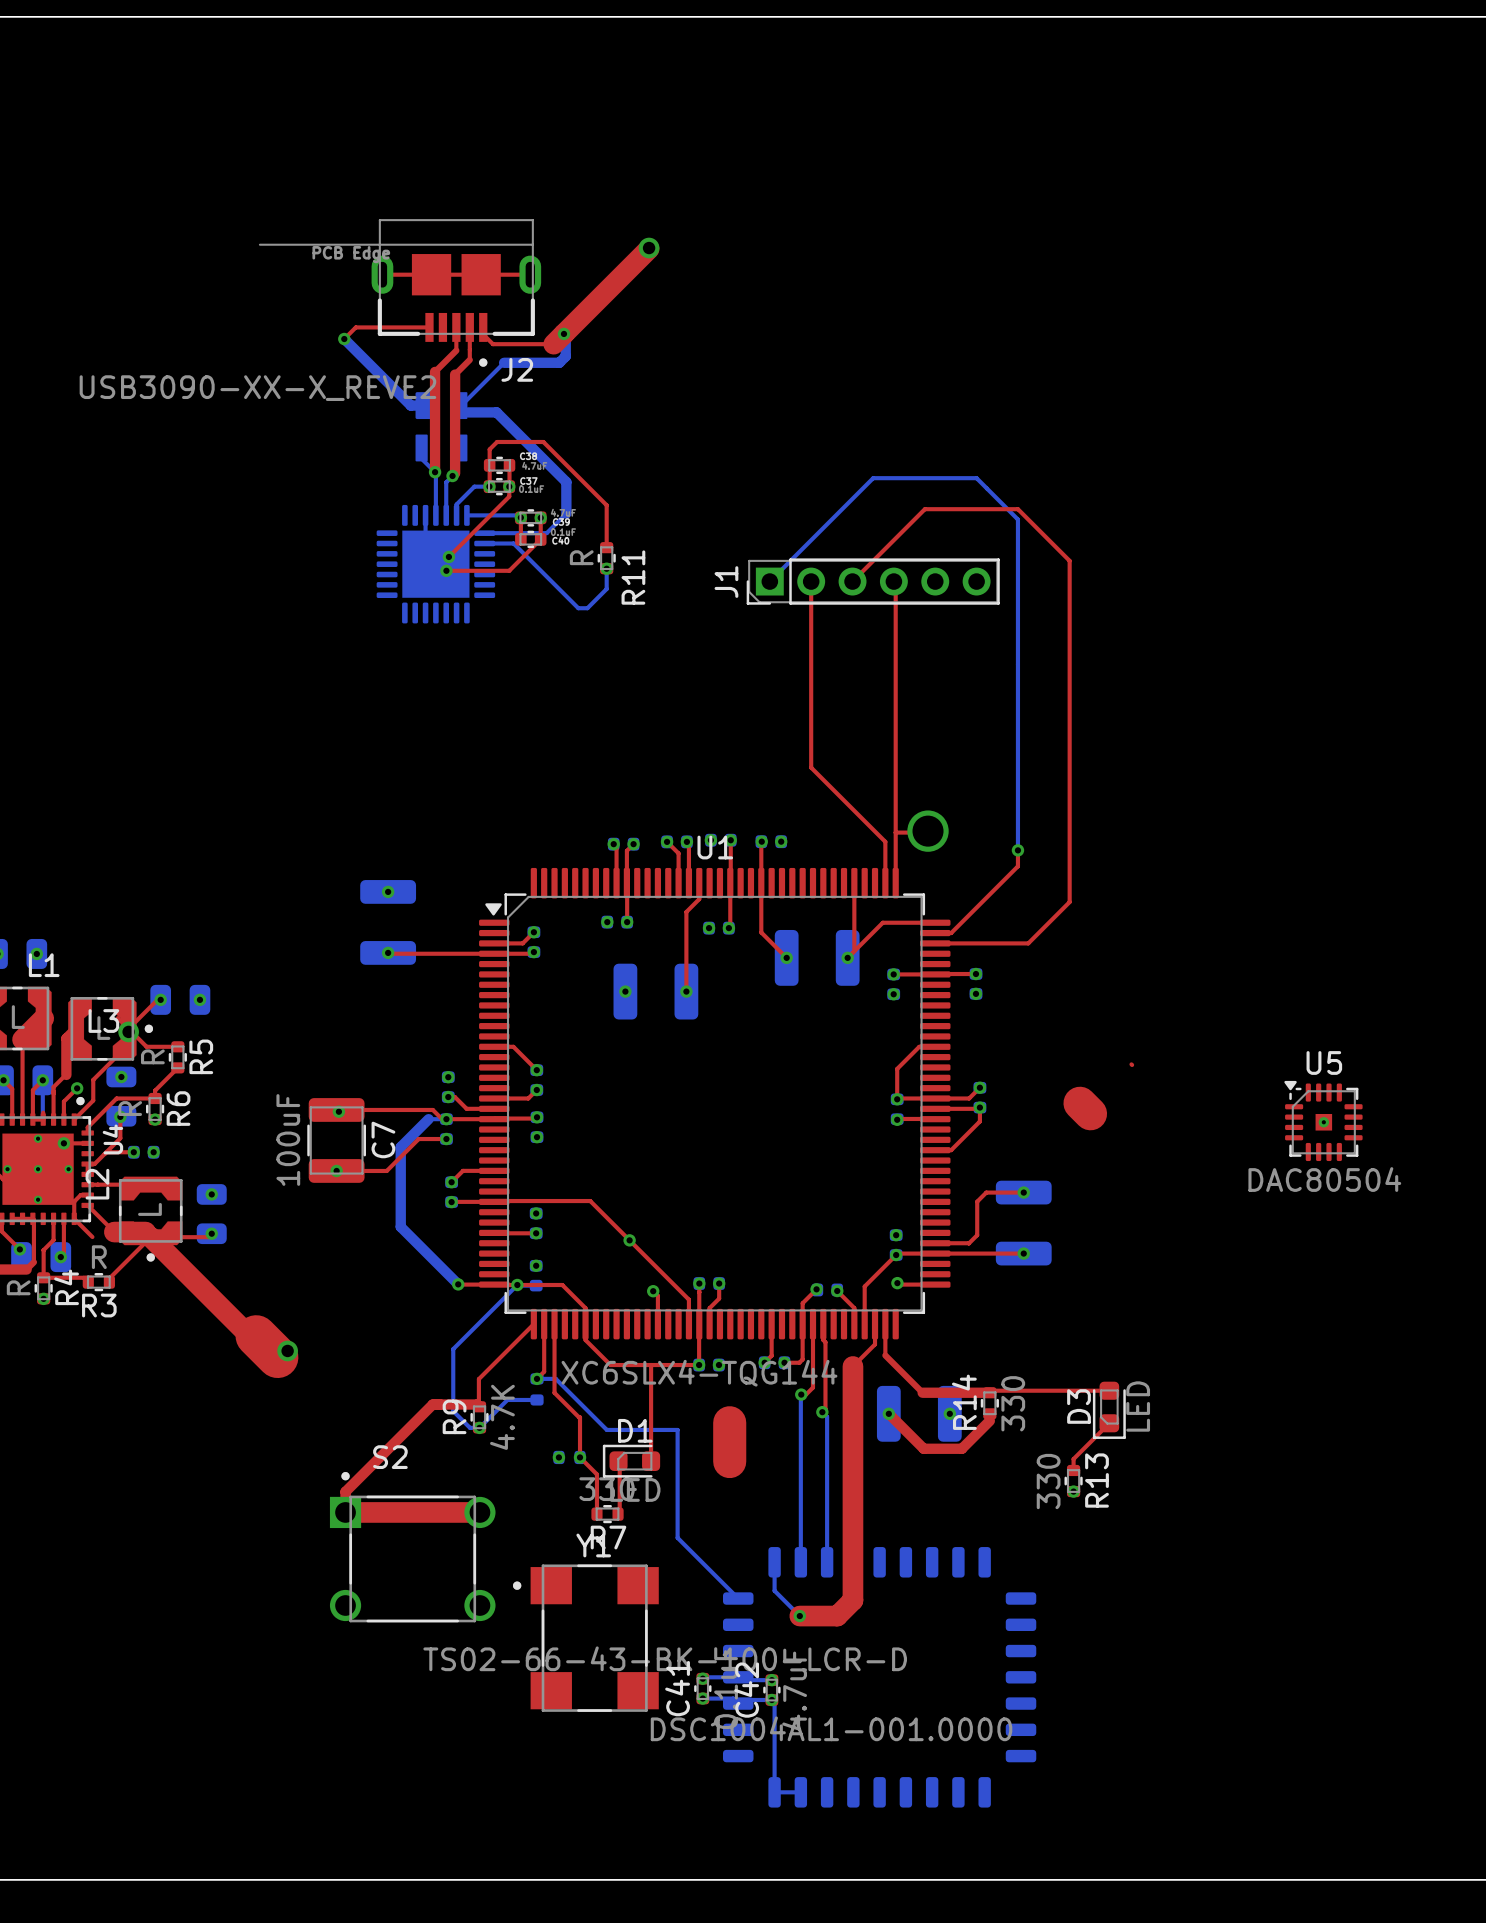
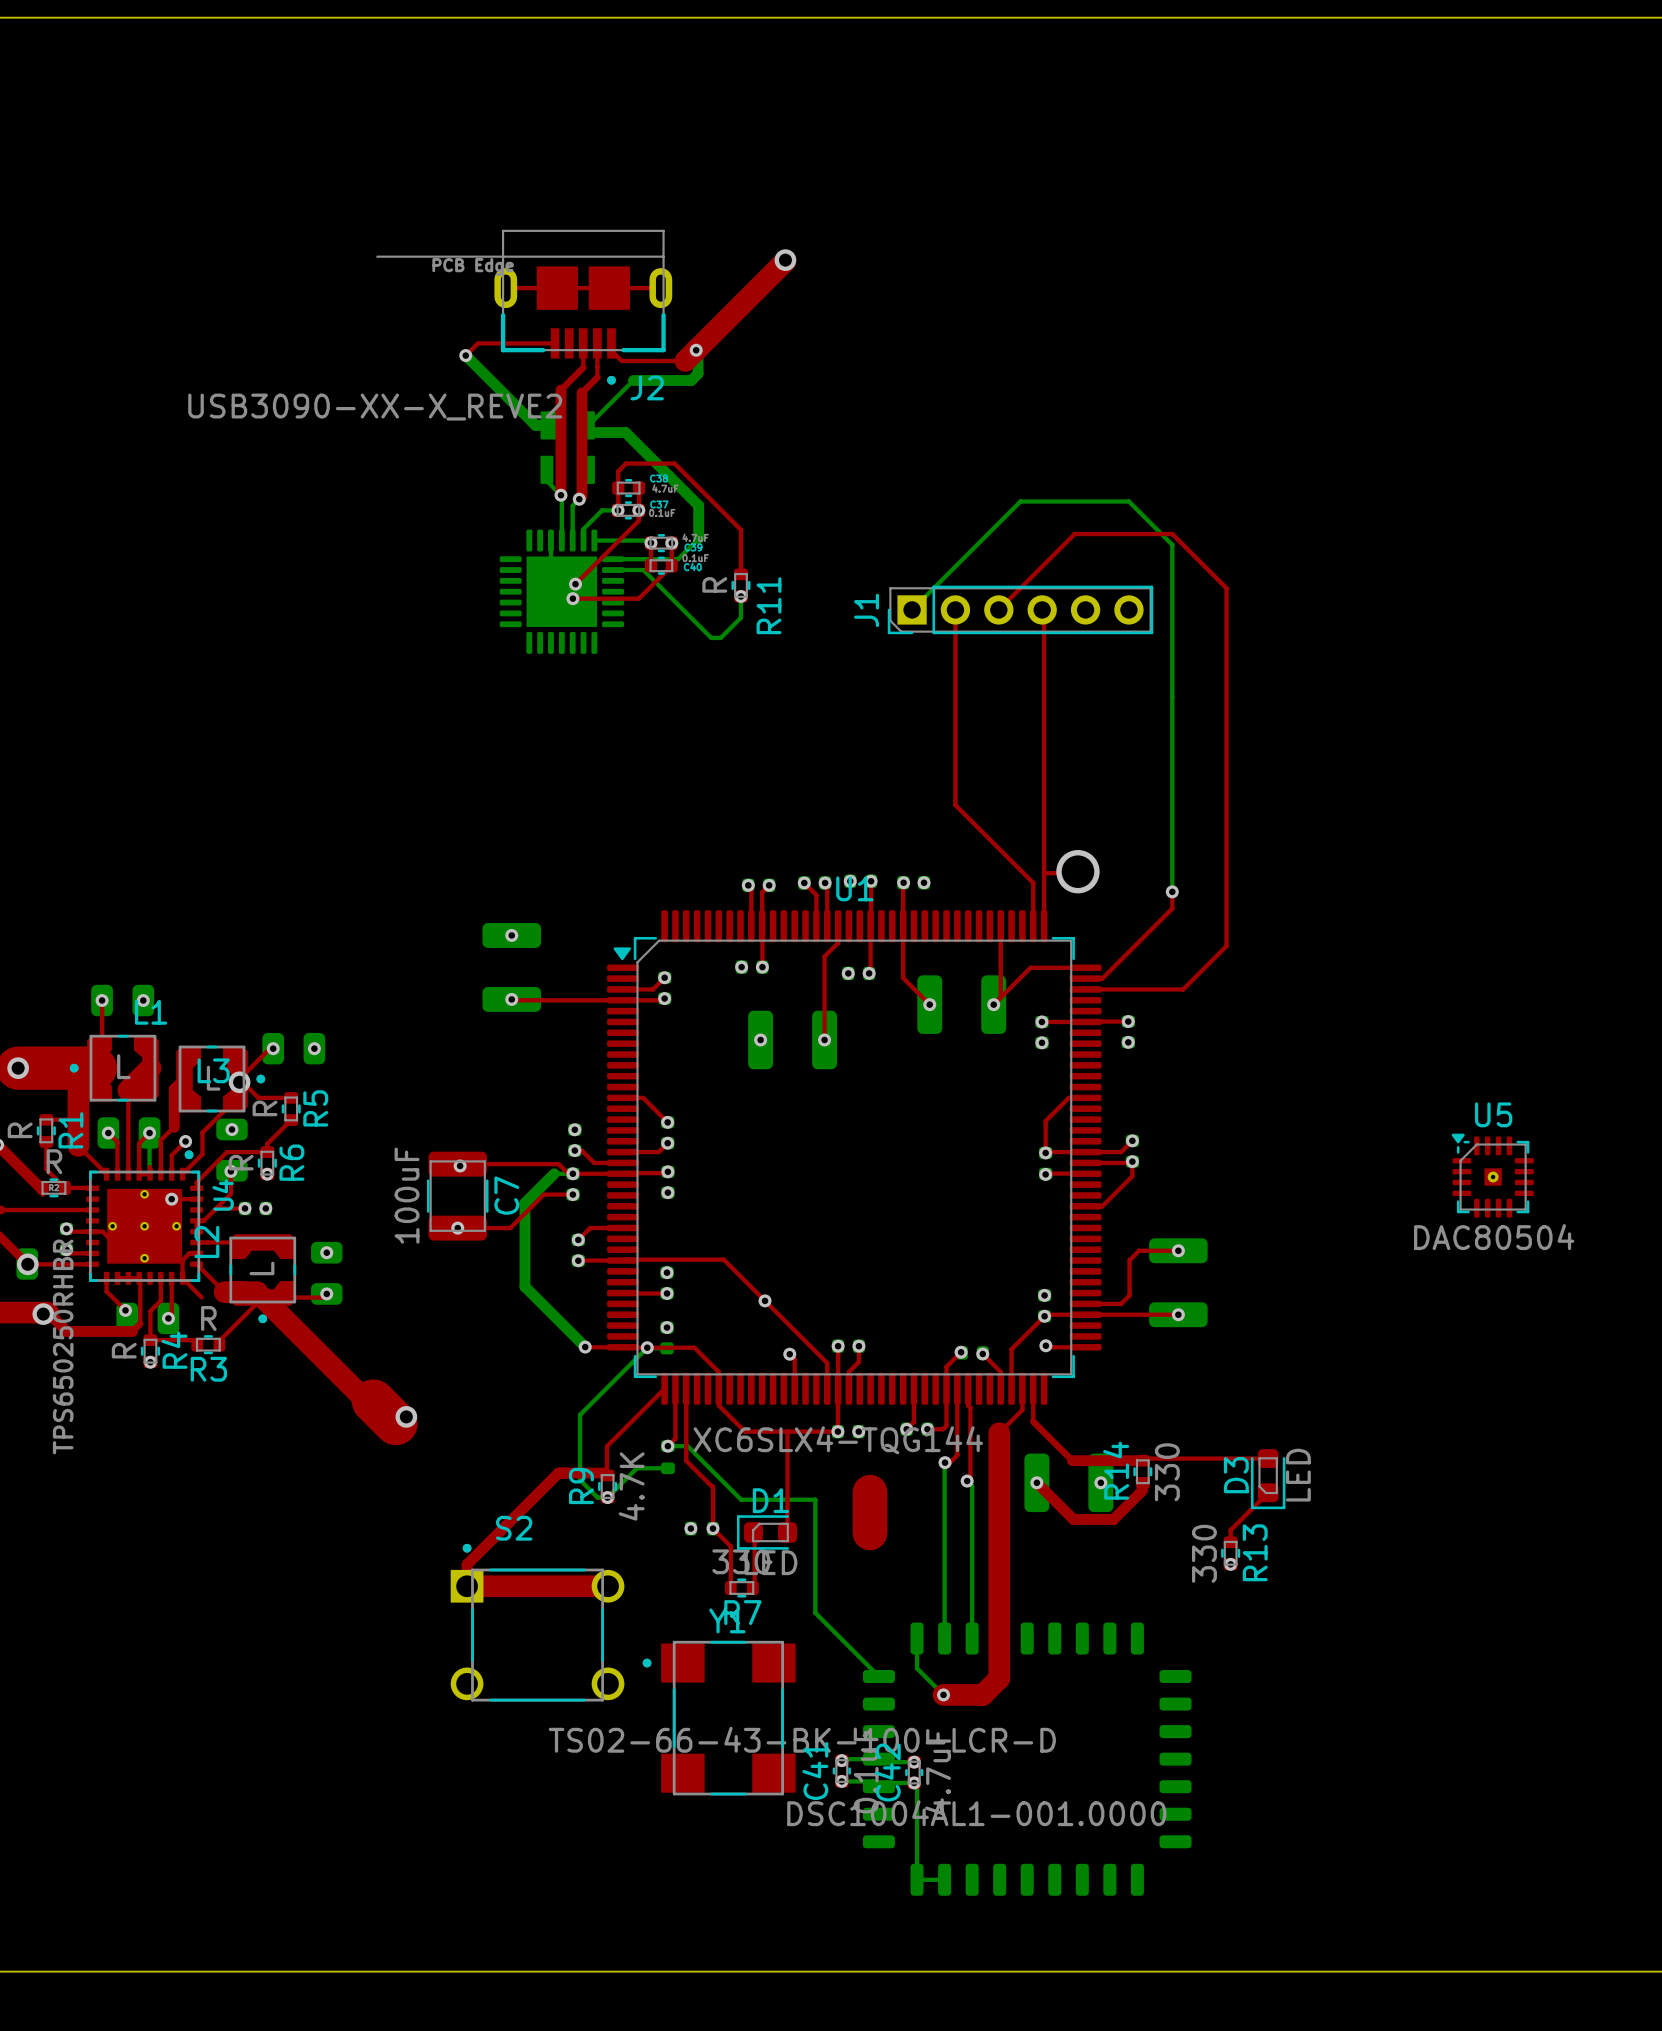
top track: (1131, 1064) (1132, 1064) -> none
top track: (1079, 1103) (1090, 1113) -> none

